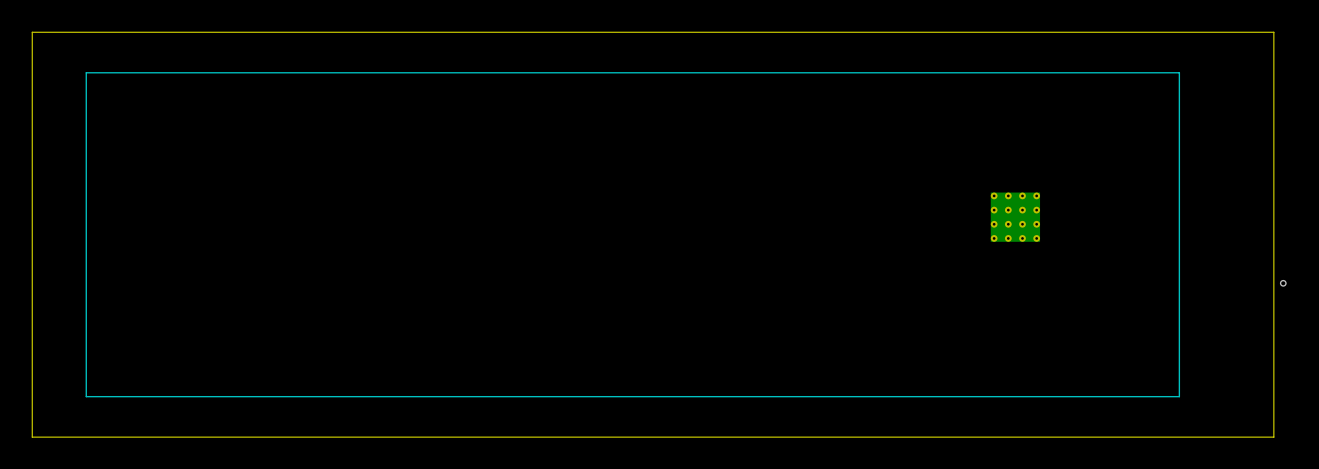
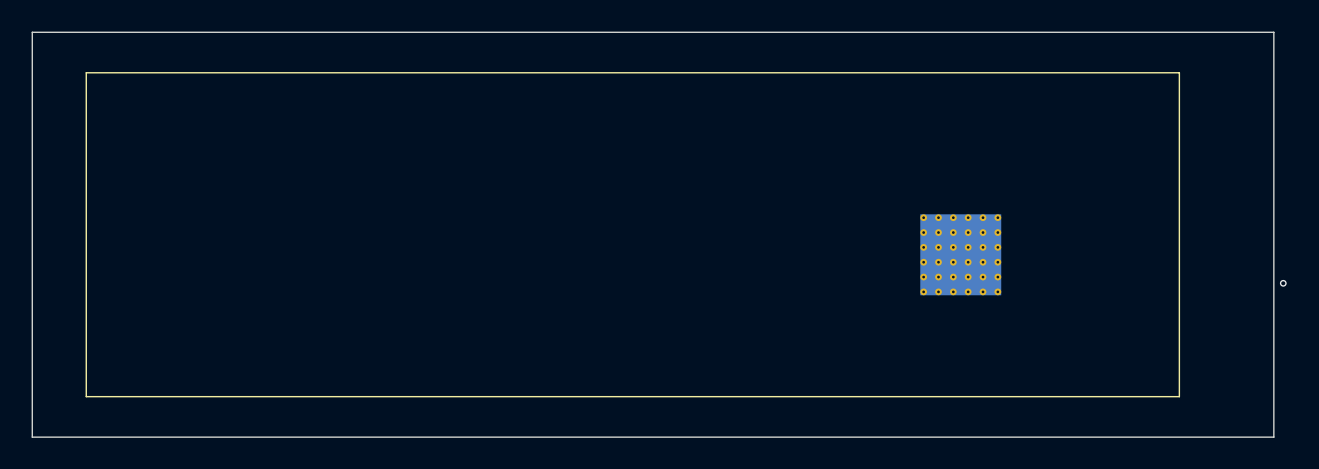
part: (1015, 217) -> none
part: none -> (960, 254)

